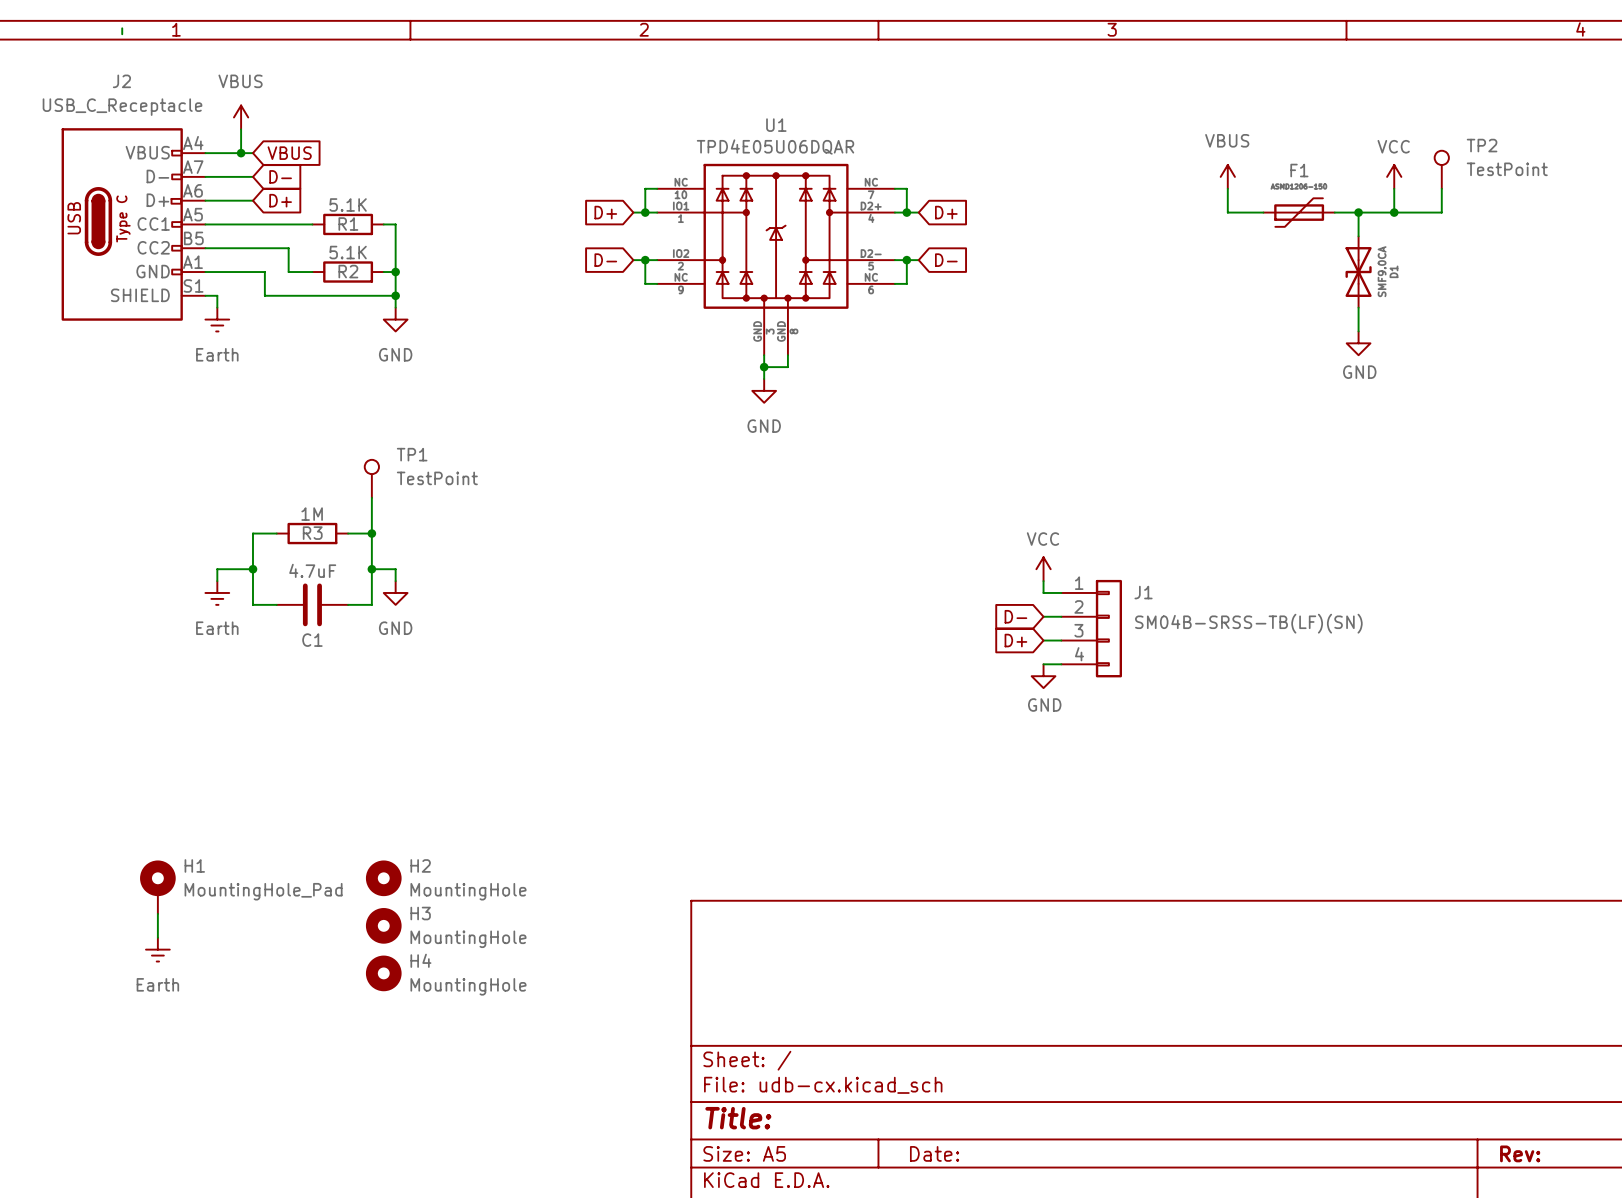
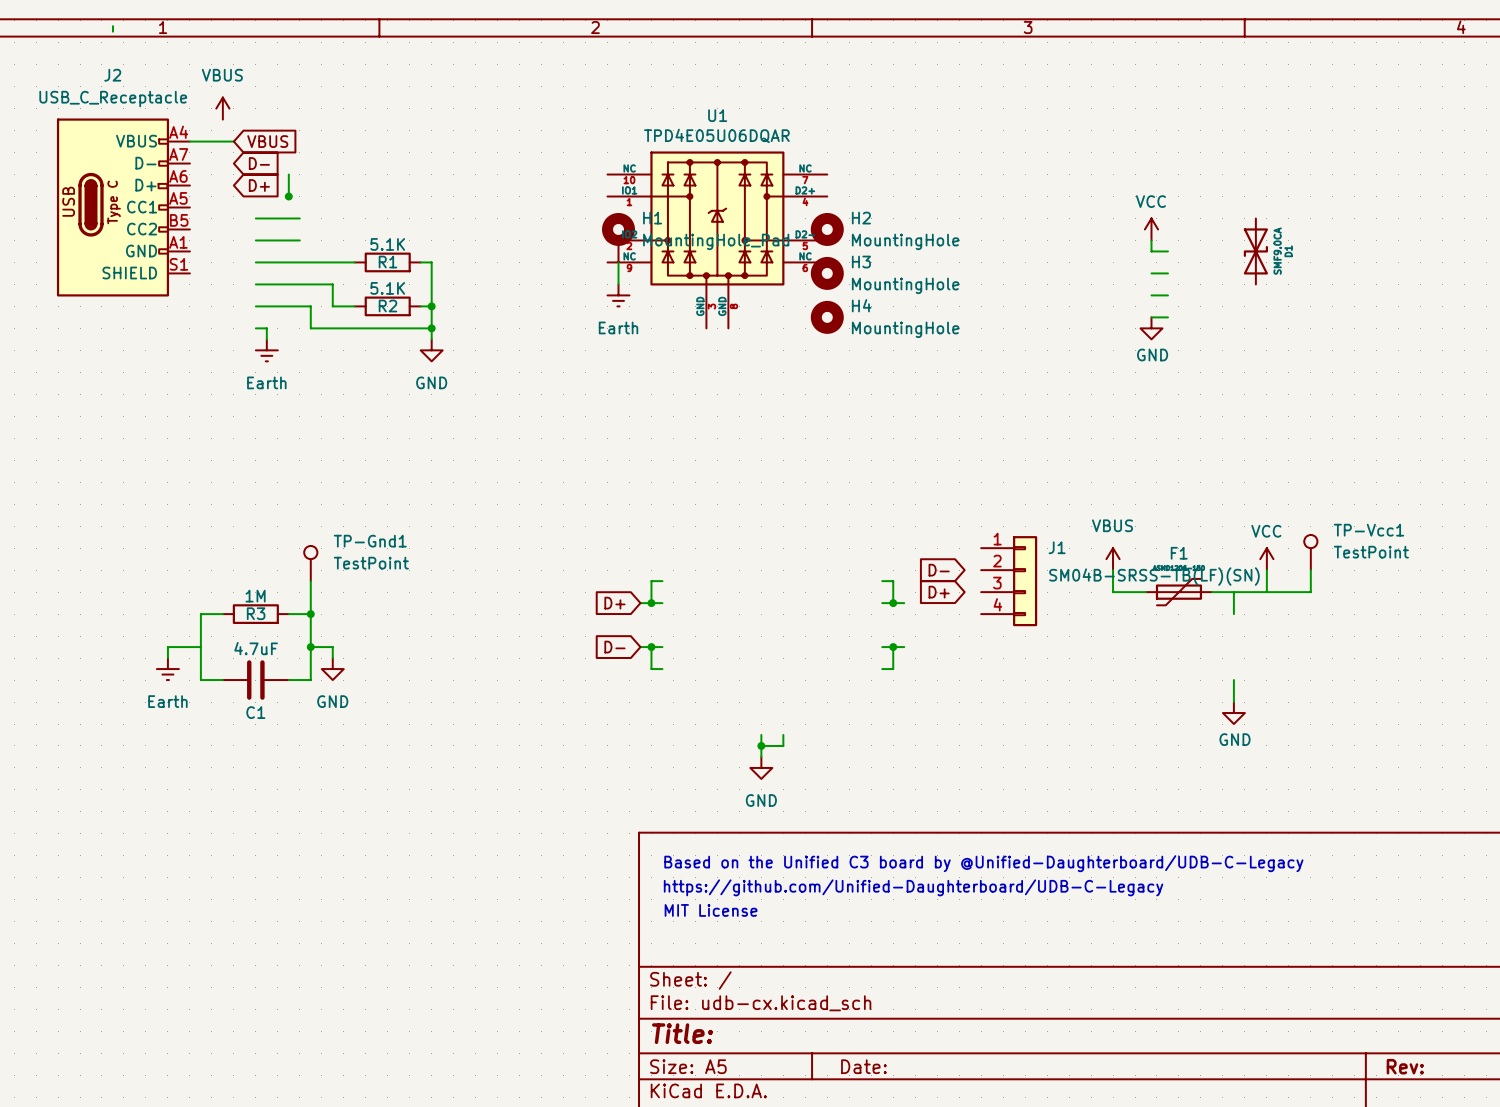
wire: (241, 129) (241, 153) -> (288, 174) (288, 196)
junction: (241, 153) -> none
TP2: TestPoint (1441, 169) -> none
wire: (205, 176) (252, 176) -> (255, 218) (299, 218)
power symbol: VBUS (1227, 176) -> none
power symbol position: VCC (1394, 176) -> VCC (1151, 229)
wire: (657, 188) (645, 188) (645, 212) -> none
wire: (894, 188) (906, 188) (906, 212) -> none
wire: (1227, 188) (1227, 212) (1263, 212) -> none
wire: (1394, 188) (1394, 212) -> none
wire: (1441, 188) (1441, 212) (1334, 212) -> none
wire: (205, 200) (252, 200) -> (255, 240) (299, 240)
junction: none -> (288, 196)
global label: D+ (605, 212) -> none
wire: (633, 212) (657, 212) -> none
junction: (645, 212) -> none
wire: (894, 212) (918, 212) -> none
junction: (906, 212) -> none
global label: D+ (946, 212) -> none
F1 position: (1299, 212) -> (1178, 592)
wire: (1358, 212) (1358, 236) -> none
junction: (1358, 212) -> none
junction: (1394, 212) -> none
wire: (205, 224) (312, 224) -> (255, 262) (354, 262)
R1 position: (348, 224) -> (387, 262)
wire: (383, 224) (395, 224) (395, 307) -> (420, 262) (431, 262) (431, 339)
wire: (205, 248) (288, 248) (288, 272) (312, 272) -> (255, 284) (332, 284) (332, 306) (354, 306)
global label: D- (605, 260) -> none
wire: (633, 260) (657, 260) -> none
wire: (645, 260) (645, 283) (657, 283) -> none
junction: (645, 260) -> none
wire: (906, 260) (906, 283) (894, 283) -> none
junction: (906, 260) -> none
global label: D- (946, 260) -> none
wire: none -> (1151, 240) (1151, 251) (1167, 251)
wire: (205, 272) (264, 272) (264, 295) (395, 295) -> (255, 306) (310, 306) (310, 328) (431, 328)
R2 position: (348, 272) -> (387, 306)
wire: (383, 272) (395, 272) -> (420, 306) (431, 306)
junction: (395, 272) -> none
wire: (205, 295) (217, 295) (217, 307) -> (255, 328) (266, 328) (266, 339)
junction: (395, 295) -> none
wire: none -> (1151, 273) (1167, 273)
wire: (1358, 307) (1358, 331) -> none
power symbol position: Earth (217, 319) -> Earth (266, 350)
power symbol position: GND (395, 319) -> GND (431, 350)
power symbol: none -> Earth (618, 295)
wire: none -> (1151, 295) (1167, 295)
junction: none -> (431, 306)
wire: none -> (1151, 317) (1167, 317)
power symbol position: GND (1358, 343) -> GND (1151, 328)
junction: none -> (431, 328)
wire: (764, 355) (764, 379) -> (618, 262) (618, 284)
wire: (787, 355) (787, 367) (764, 367) -> none
junction: (764, 367) -> none
power symbol: GND (764, 390) -> none
TP1: TestPoint (371, 478) -> none
wire: (371, 497) (371, 604) (348, 604) -> (310, 581) (310, 680) (288, 680)
wire: (276, 533) (252, 533) (252, 604) (276, 604) -> (222, 614) (200, 614) (200, 680) (222, 680)
R3 position: (312, 533) -> (255, 614)
wire: (348, 533) (371, 533) -> (288, 614) (310, 614)
junction: (371, 533) -> none
wire: (252, 569) (217, 569) (217, 581) -> (200, 647) (167, 647) (167, 658)
junction: (252, 569) -> none
wire: (371, 569) (395, 569) (395, 581) -> (310, 647) (332, 647) (332, 658)
junction: (371, 569) -> none
power symbol: VCC (1043, 569) -> none
wire: (1043, 581) (1043, 592) (1061, 592) -> none
power symbol: Earth (217, 592) -> none
power symbol: GND (395, 592) -> none
TP-Vcc1: none -> TestPoint (1310, 552)
C1 position: (312, 604) -> (255, 680)
power symbol: none -> VBUS (1113, 559)
power symbol: none -> VCC (1266, 559)
TP-Gnd1: none -> TestPoint (310, 563)
wire: (1043, 616) (1061, 616) -> none
wire: none -> (1113, 570) (1113, 592) (1145, 592)
wire: none -> (1266, 570) (1266, 592)
wire: none -> (1310, 570) (1310, 592) (1211, 592)
wire: none -> (662, 581) (651, 581) (651, 603)
wire: none -> (882, 581) (893, 581) (893, 603)
wire: (1043, 640) (1061, 640) -> none
wire: none -> (1233, 592) (1233, 614)
global label: none -> D+ (614, 603)
wire: none -> (640, 603) (662, 603)
junction: none -> (651, 603)
wire: none -> (882, 603) (904, 603)
junction: none -> (893, 603)
junction: none -> (310, 614)
wire: (1043, 664) (1061, 664) -> none
power symbol: GND (1043, 676) -> none
junction: none -> (310, 647)
global label: none -> D- (614, 647)
wire: none -> (640, 647) (662, 647)
wire: none -> (651, 647) (651, 669) (662, 669)
junction: none -> (651, 647)
wire: none -> (882, 647) (904, 647)
wire: none -> (893, 647) (893, 669) (882, 669)
junction: none -> (893, 647)
power symbol: none -> Earth (167, 669)
power symbol: none -> GND (332, 669)
wire: none -> (1233, 680) (1233, 702)
power symbol: none -> GND (1233, 713)
wire: none -> (761, 734) (761, 756)
wire: none -> (783, 734) (783, 745) (761, 745)
junction: none -> (761, 745)
power symbol: none -> GND (761, 767)
H2 position: (383, 878) -> (827, 229)
H1 position: (157, 887) -> (618, 237)
wire: (157, 913) (157, 937) -> none
H3 position: (383, 925) -> (827, 273)
text: none -> Based on the Unified C3 board by @Unified-Daughterboard/UDB-C-Legacy (983, 863)
power symbol: Earth (157, 949) -> none
text: none -> https://github.com/Unified-Daughterboard/UDB-C-Legacy (913, 887)
H4 position: (383, 973) -> (827, 317)
text: none -> MIT License (711, 910)

